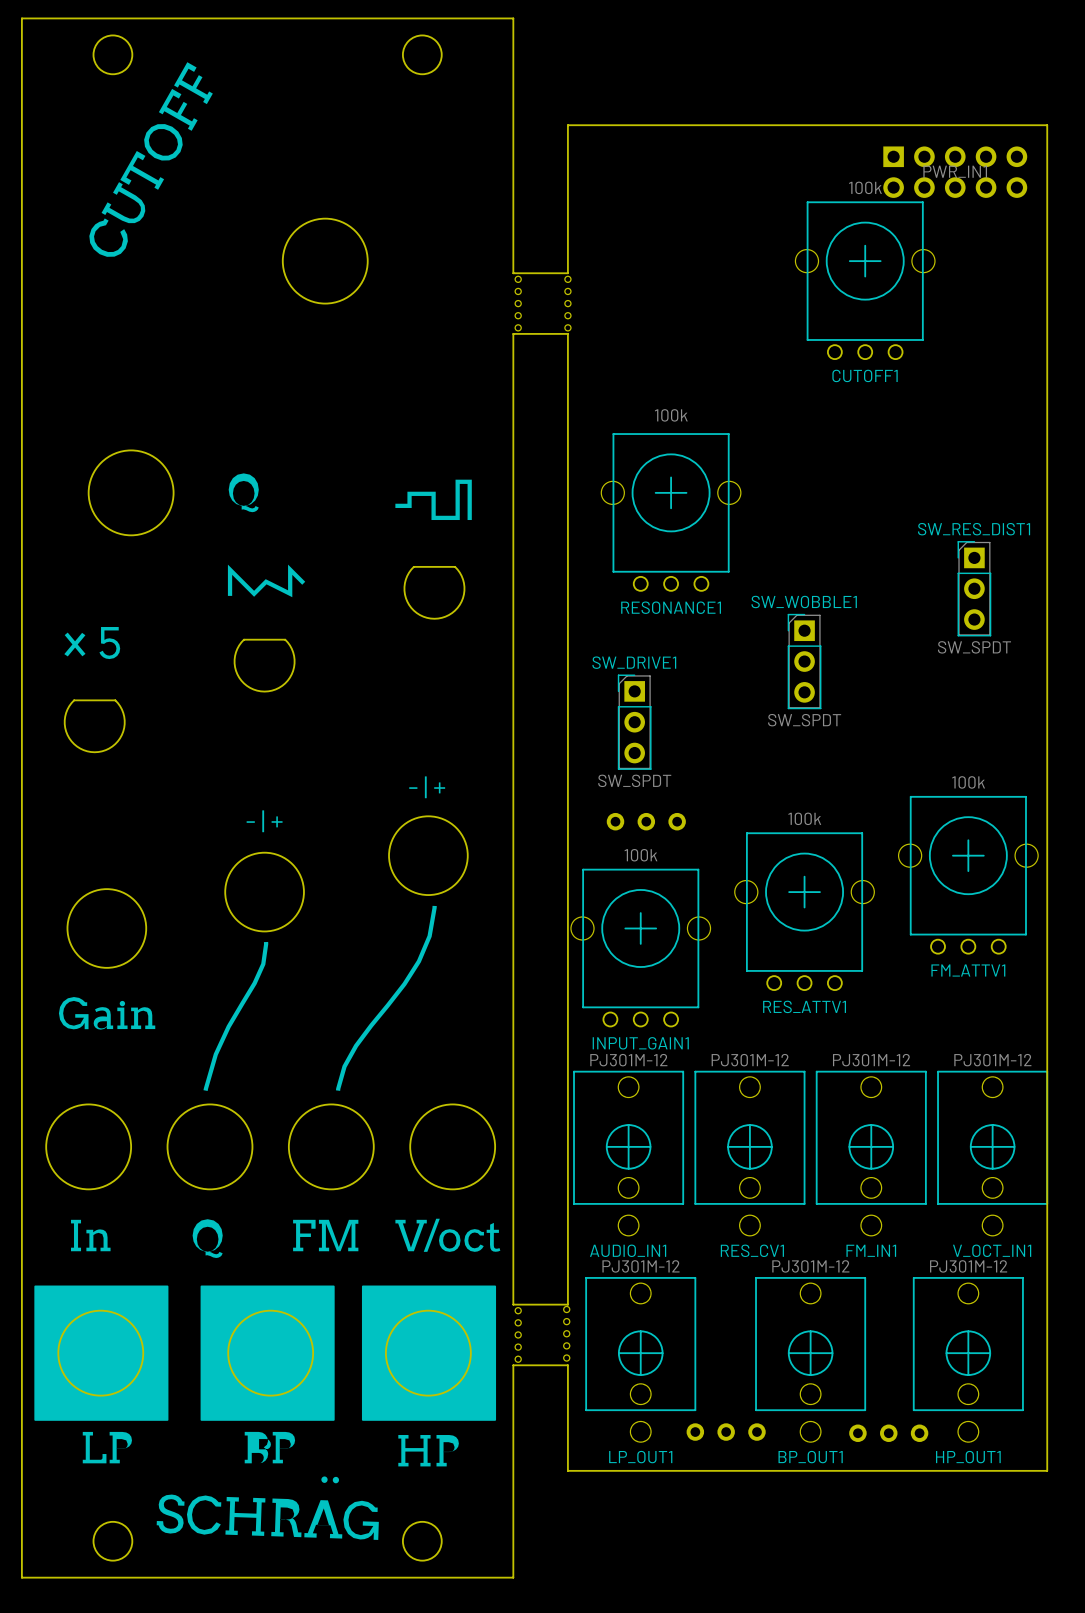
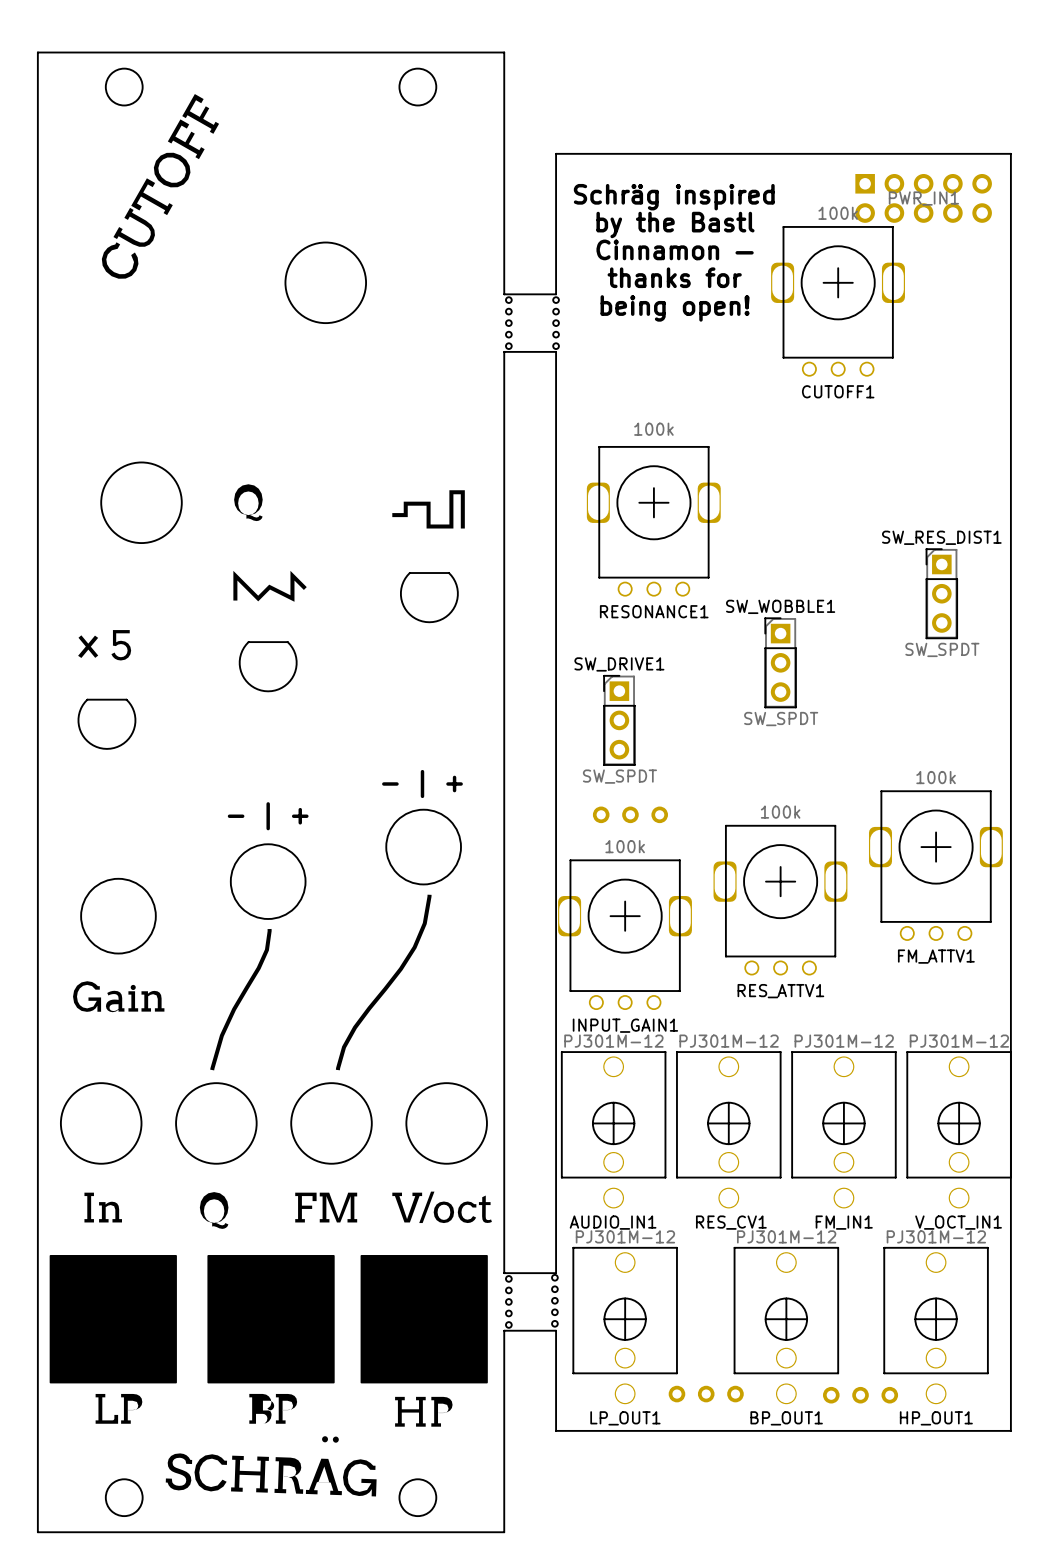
text: none -> Schräg inspired (674, 197)
text: none -> by the Bastl (675, 225)
CUTOFF1 footprint: [794, 201, 936, 361] -> [771, 226, 905, 377]
text: none -> Cinnamon — (675, 249)
text: none -> thanks for (674, 277)
text: none -> being open! (675, 308)
RESONANCE1 footprint: [600, 433, 742, 592] -> [586, 446, 721, 597]
FM_ATTV1 footprint: [897, 795, 1039, 955] -> [868, 790, 1003, 941]
RES_ATTV1 footprint: [734, 832, 875, 991] -> [713, 824, 848, 976]
INPUT_GAIN1 footprint: [570, 868, 712, 1028] -> [558, 859, 692, 1011]

